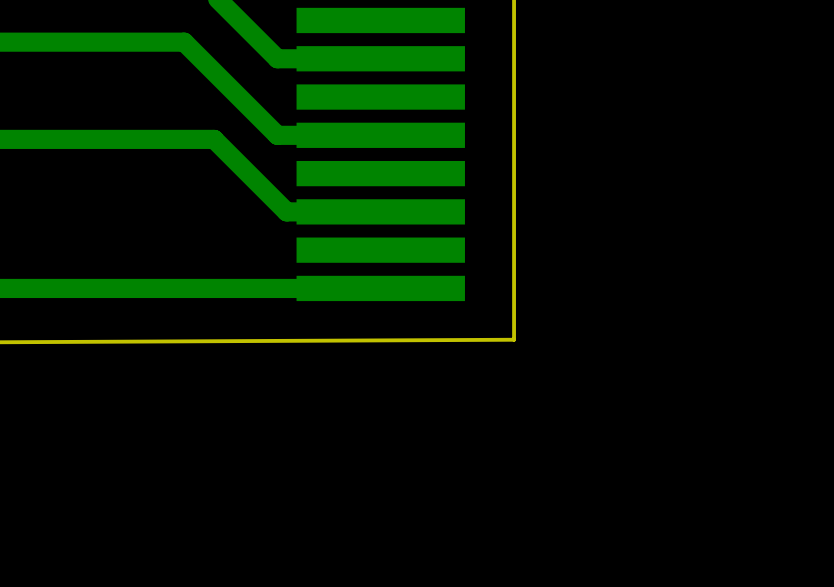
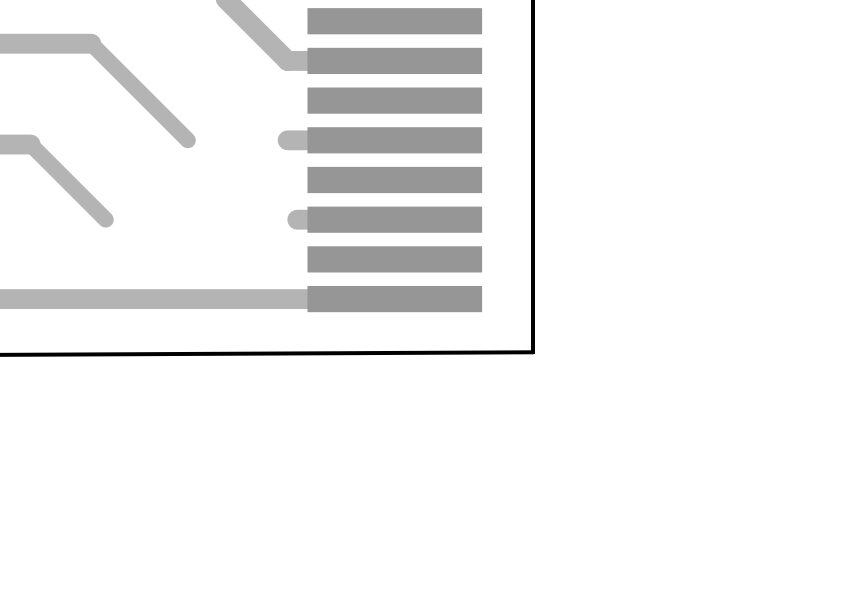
track: (88, 42) (184, 42) (277, 135) -> (91, 43) (187, 140)
track: (29, 139) (214, 139) (286, 211) -> (30, 144) (105, 219)

